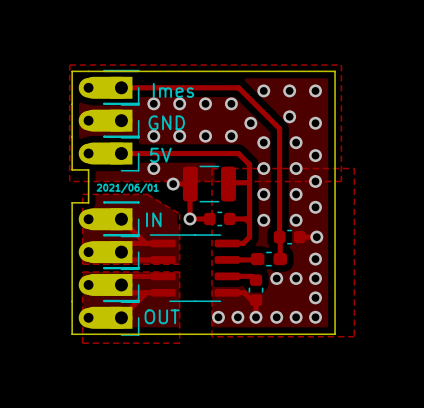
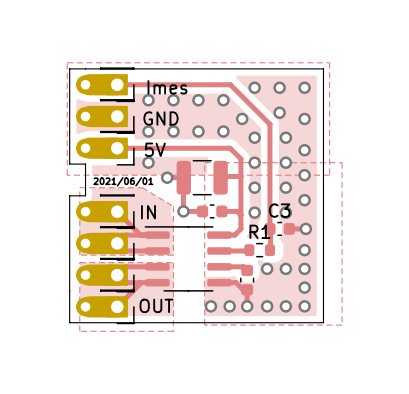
C3 name: none -> C3 (279, 210)
part: (268, 259) -> none
R1: none -> (259, 250)

